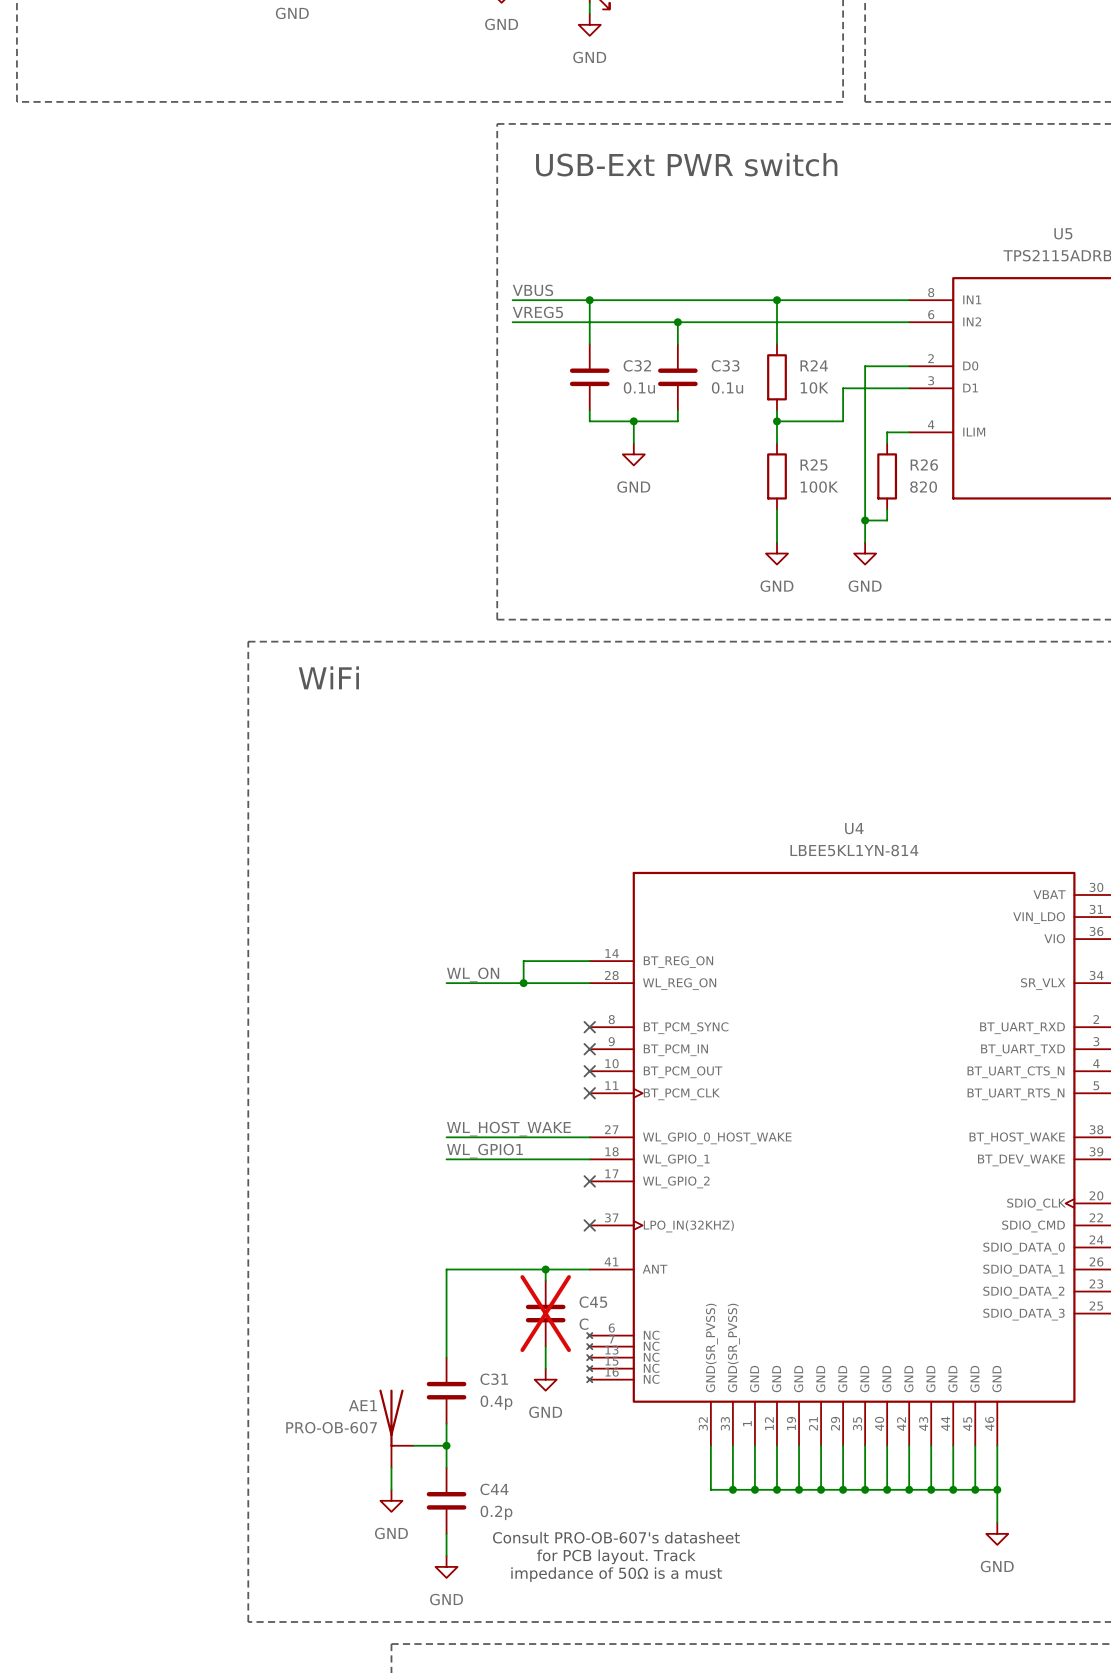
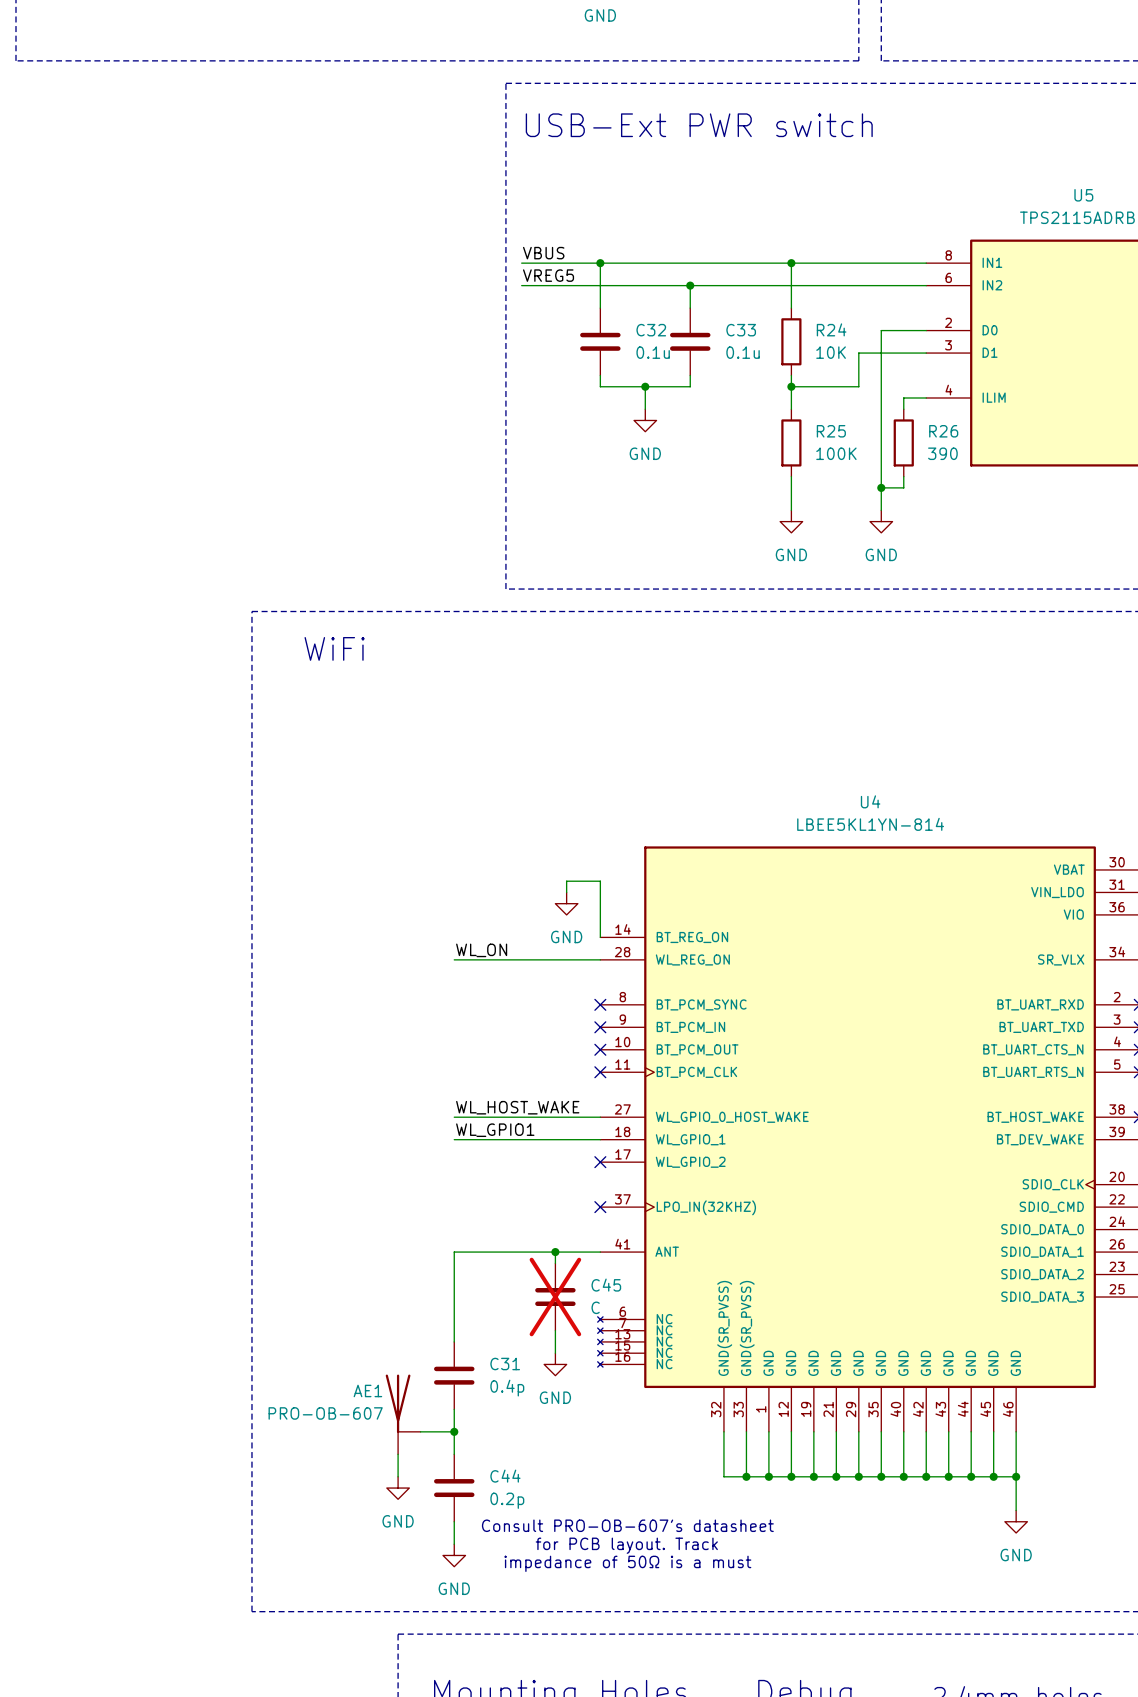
R26 value: 820 (923, 487) -> 390 (942, 453)
power symbol: none -> GND (566, 903)
wire: (589, 961) (523, 961) (523, 983) -> (600, 937) (600, 881) (566, 881) (566, 892)
junction: (523, 983) -> none

